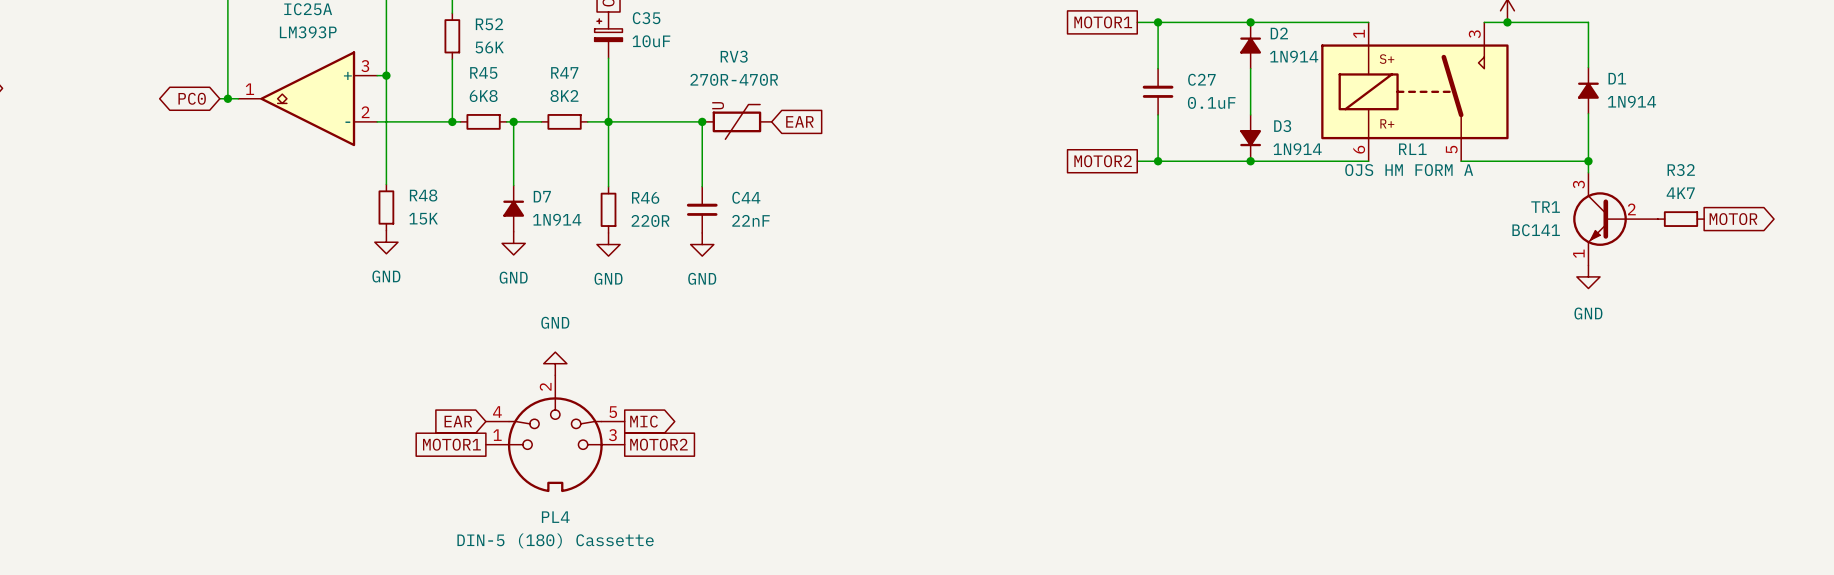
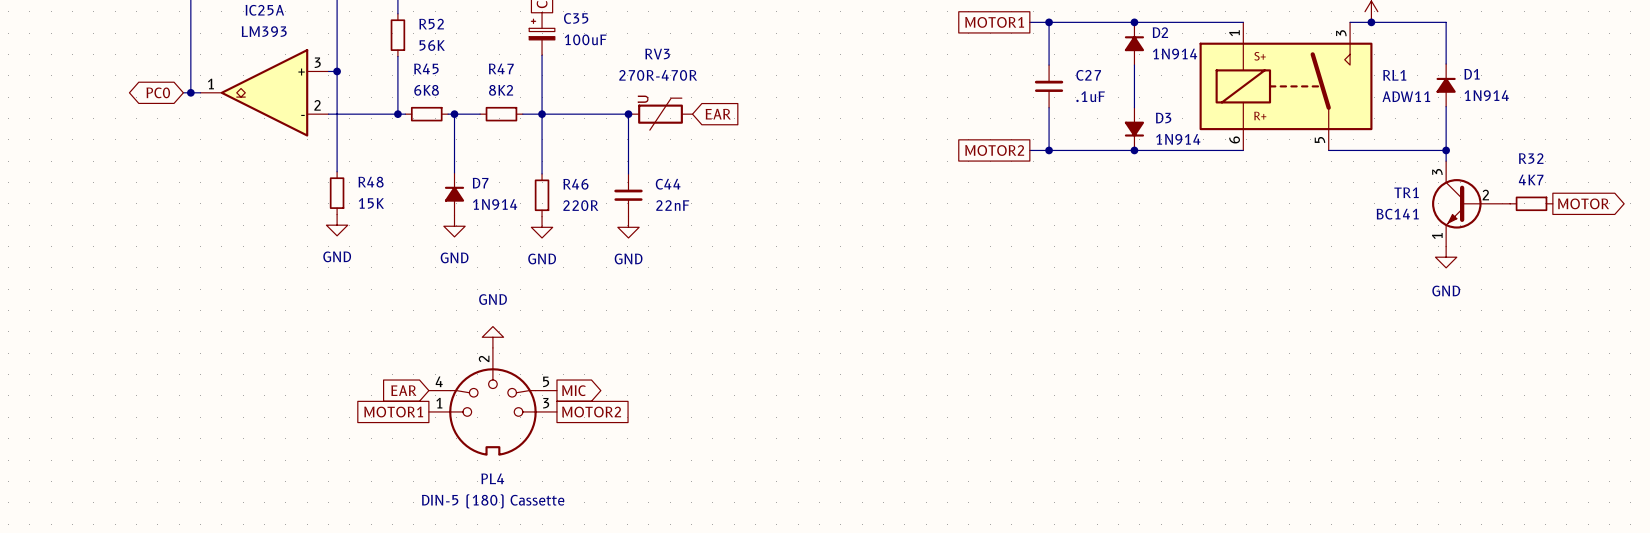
IC25A value: LM393P (308, 32) -> LM393 (264, 31)
C35 value: 10uF (651, 41) -> 100uF (585, 39)
C27 value: 0.1uF (1211, 102) -> .1uF (1090, 96)
RL1 name position: RL1 (1412, 149) -> RL1 (1394, 75)
RL1 value: OJS HM FORM A (1409, 170) -> ADW11 (1406, 96)

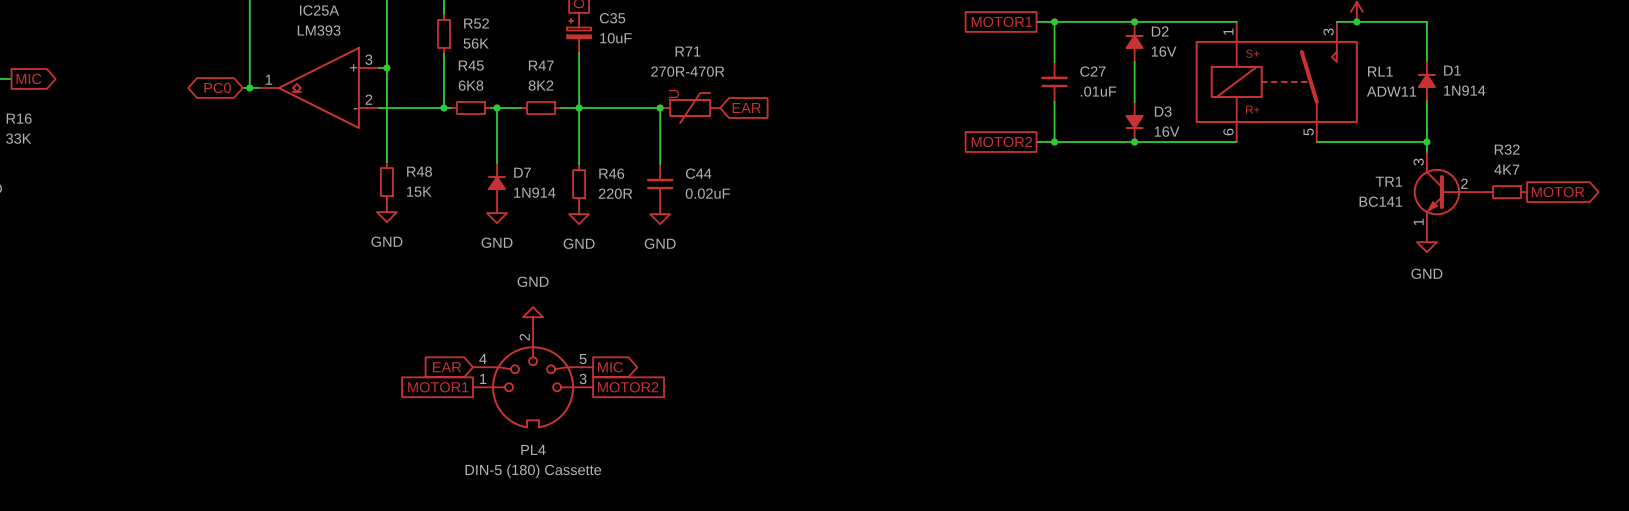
C35 value: 100uF (585, 39) -> 10uF (615, 38)
RV3 name: RV3 (657, 54) -> R71 (687, 51)
D2 value: 1N914 (1175, 54) -> 16V (1164, 51)
C27 value: .1uF (1090, 96) -> .01uF (1098, 91)
D3 value: 1N914 (1178, 139) -> 16V (1167, 131)
C44 value: 22nF (672, 205) -> 0.02uF (707, 193)

